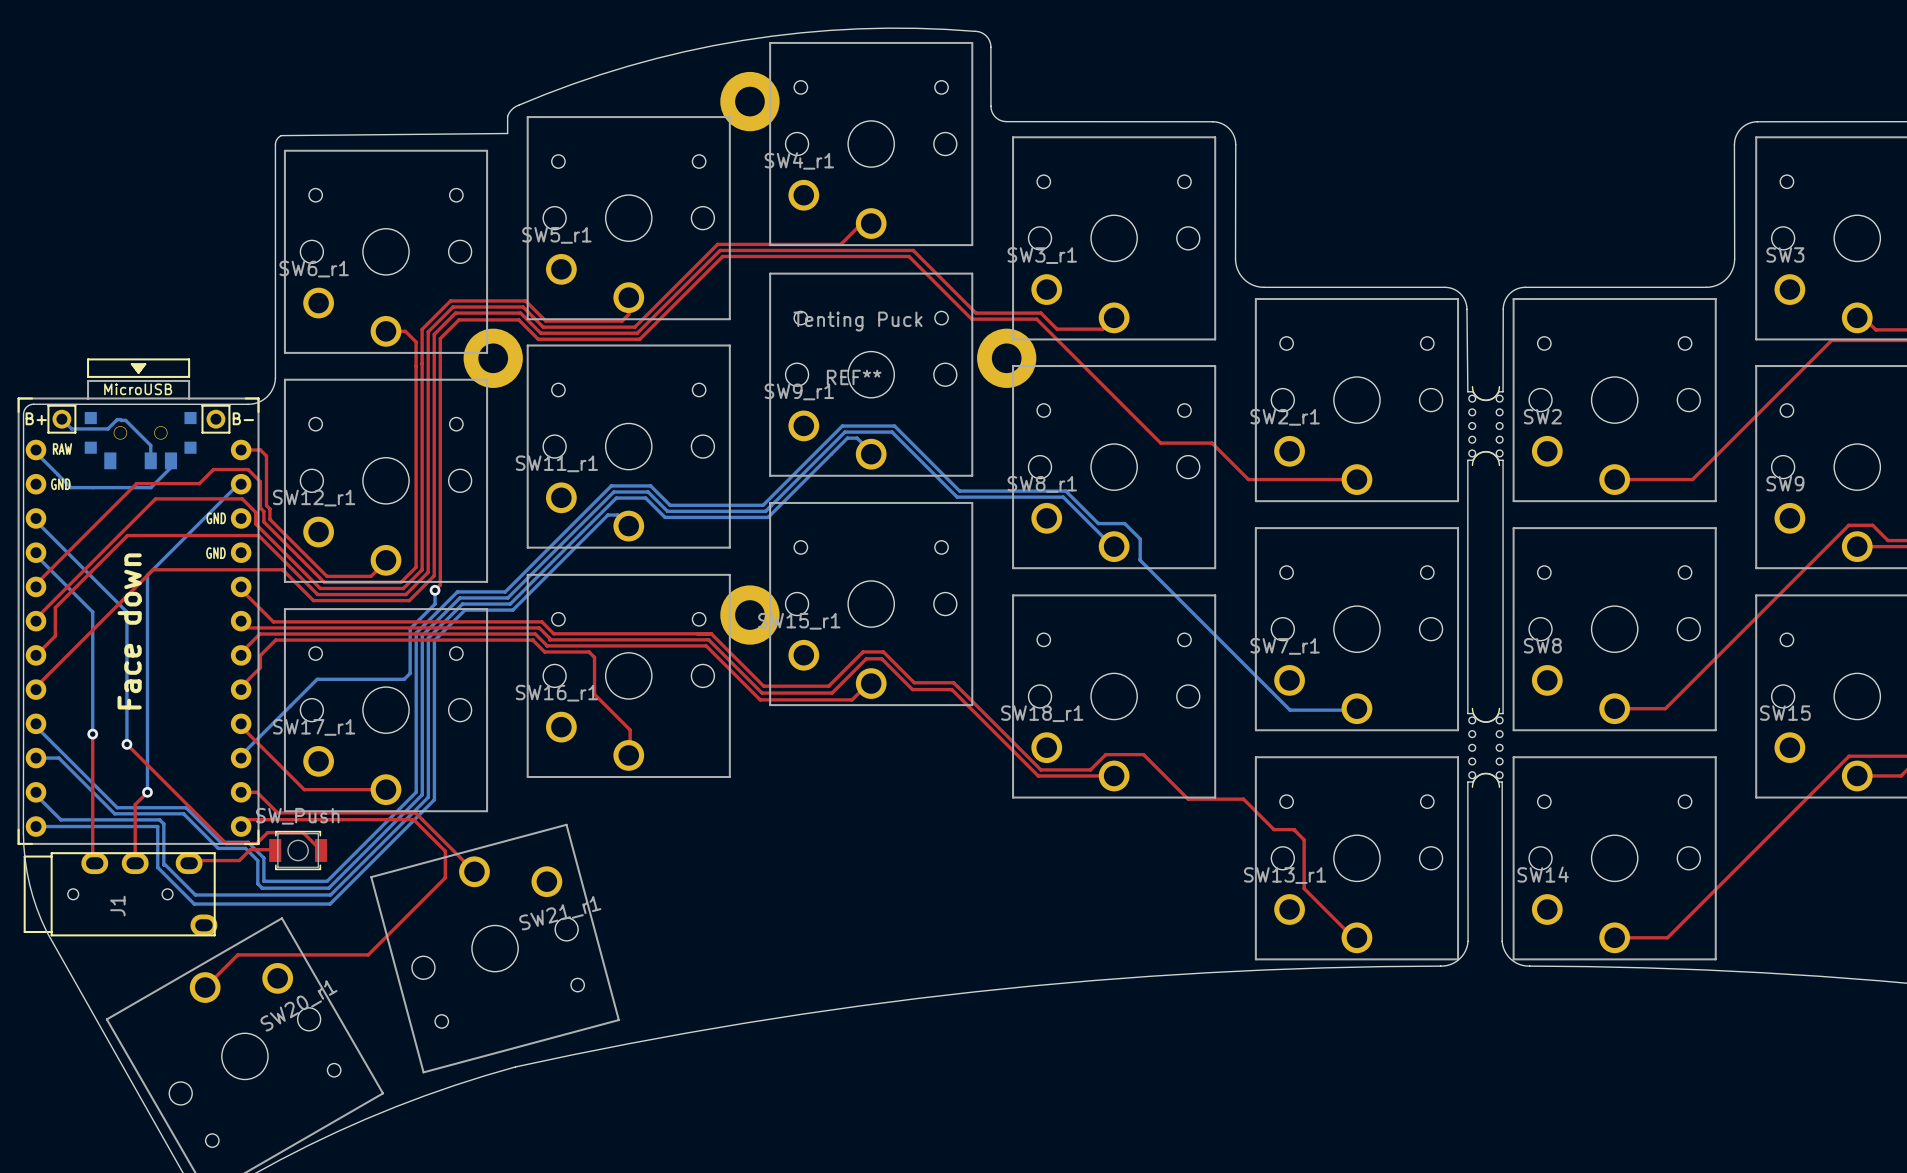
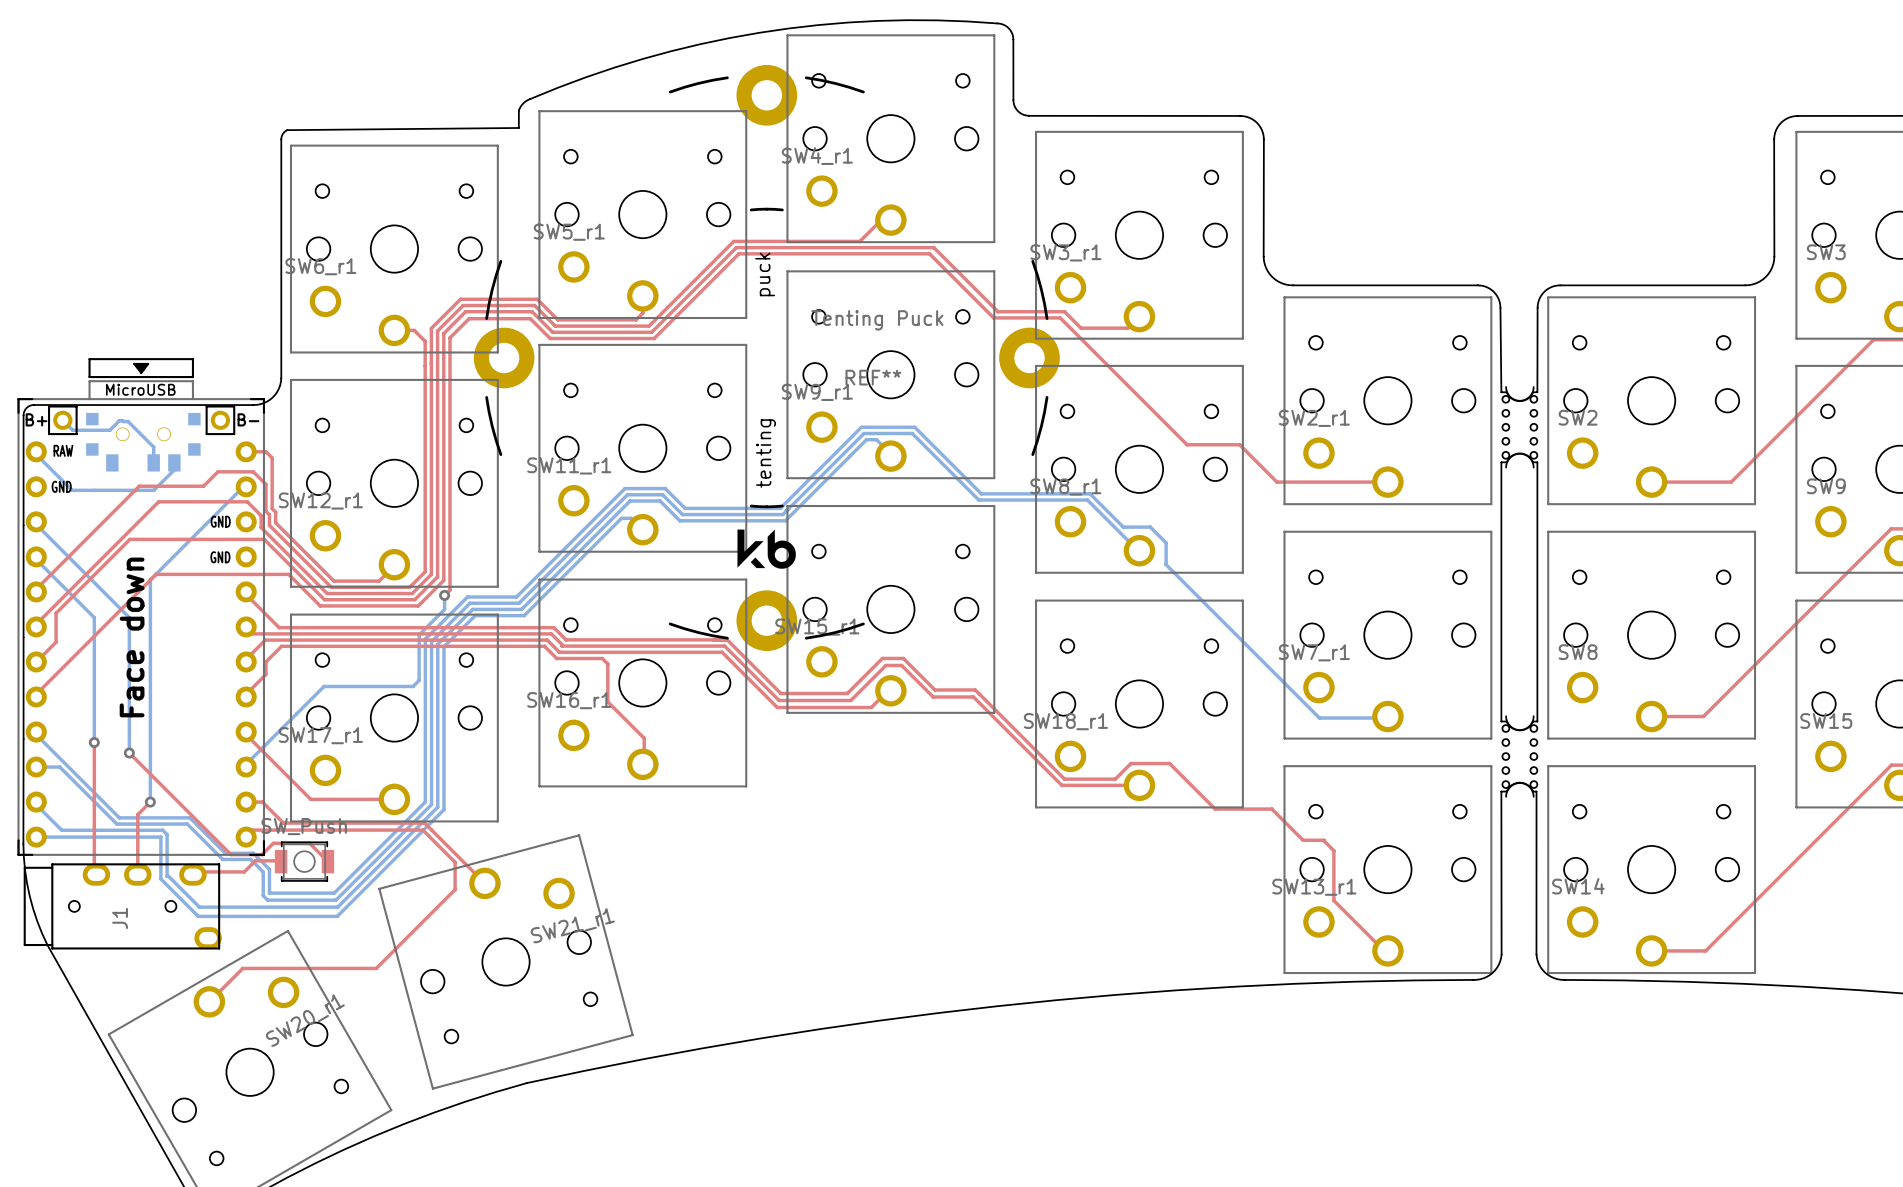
REF** footprint: [463, 71, 1037, 645] -> [473, 64, 1060, 652]

